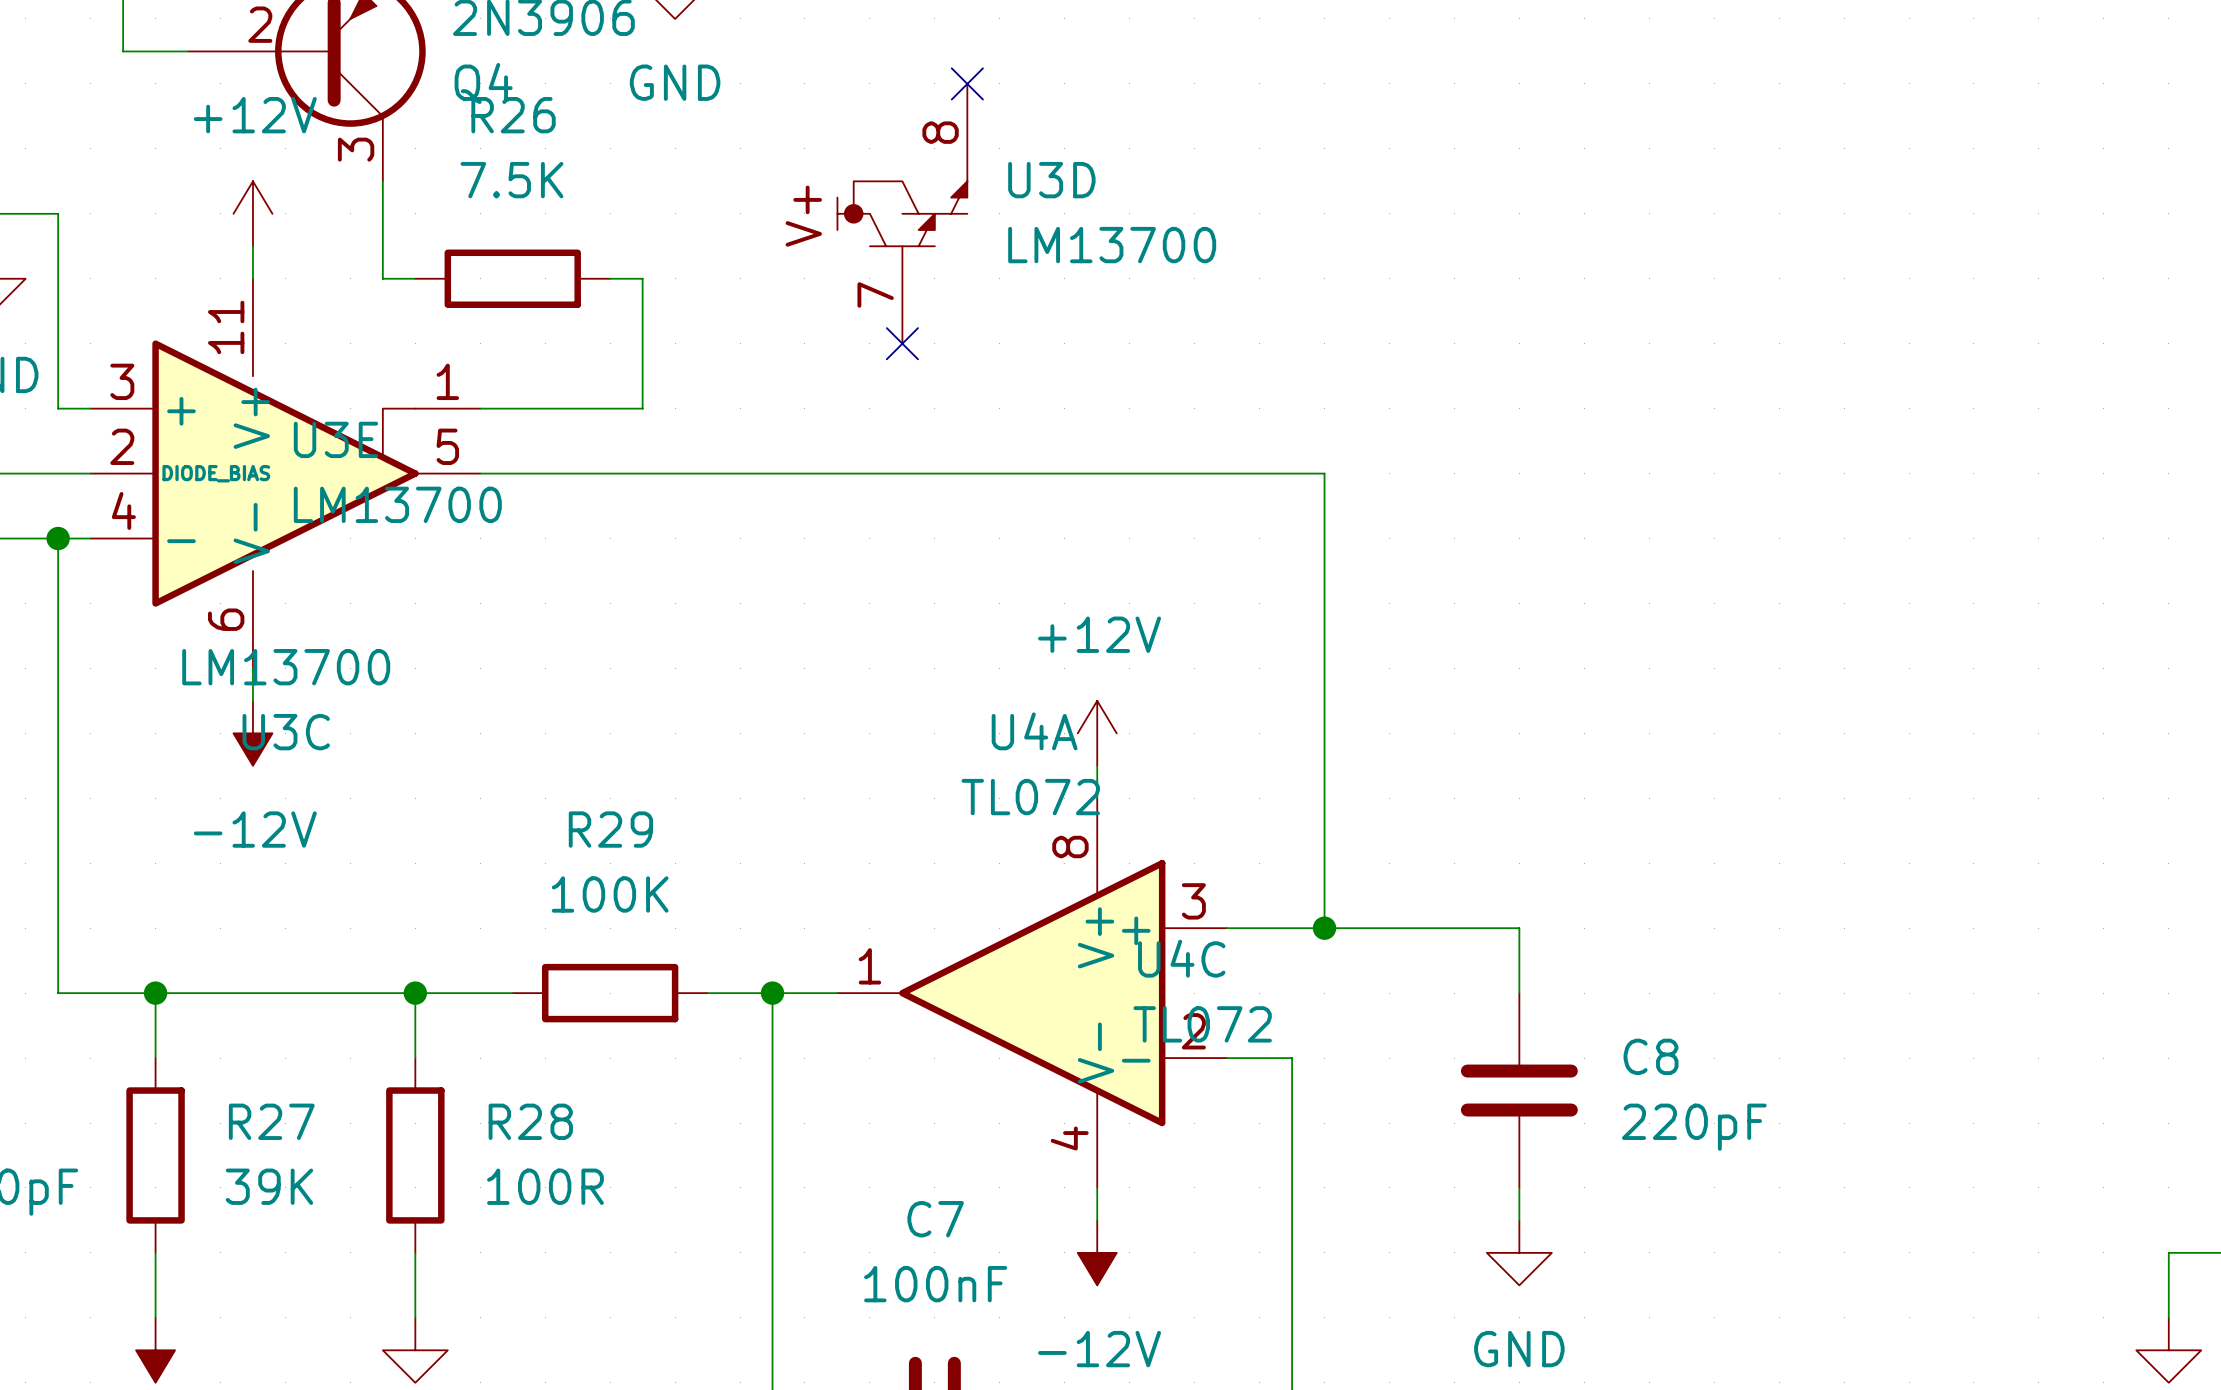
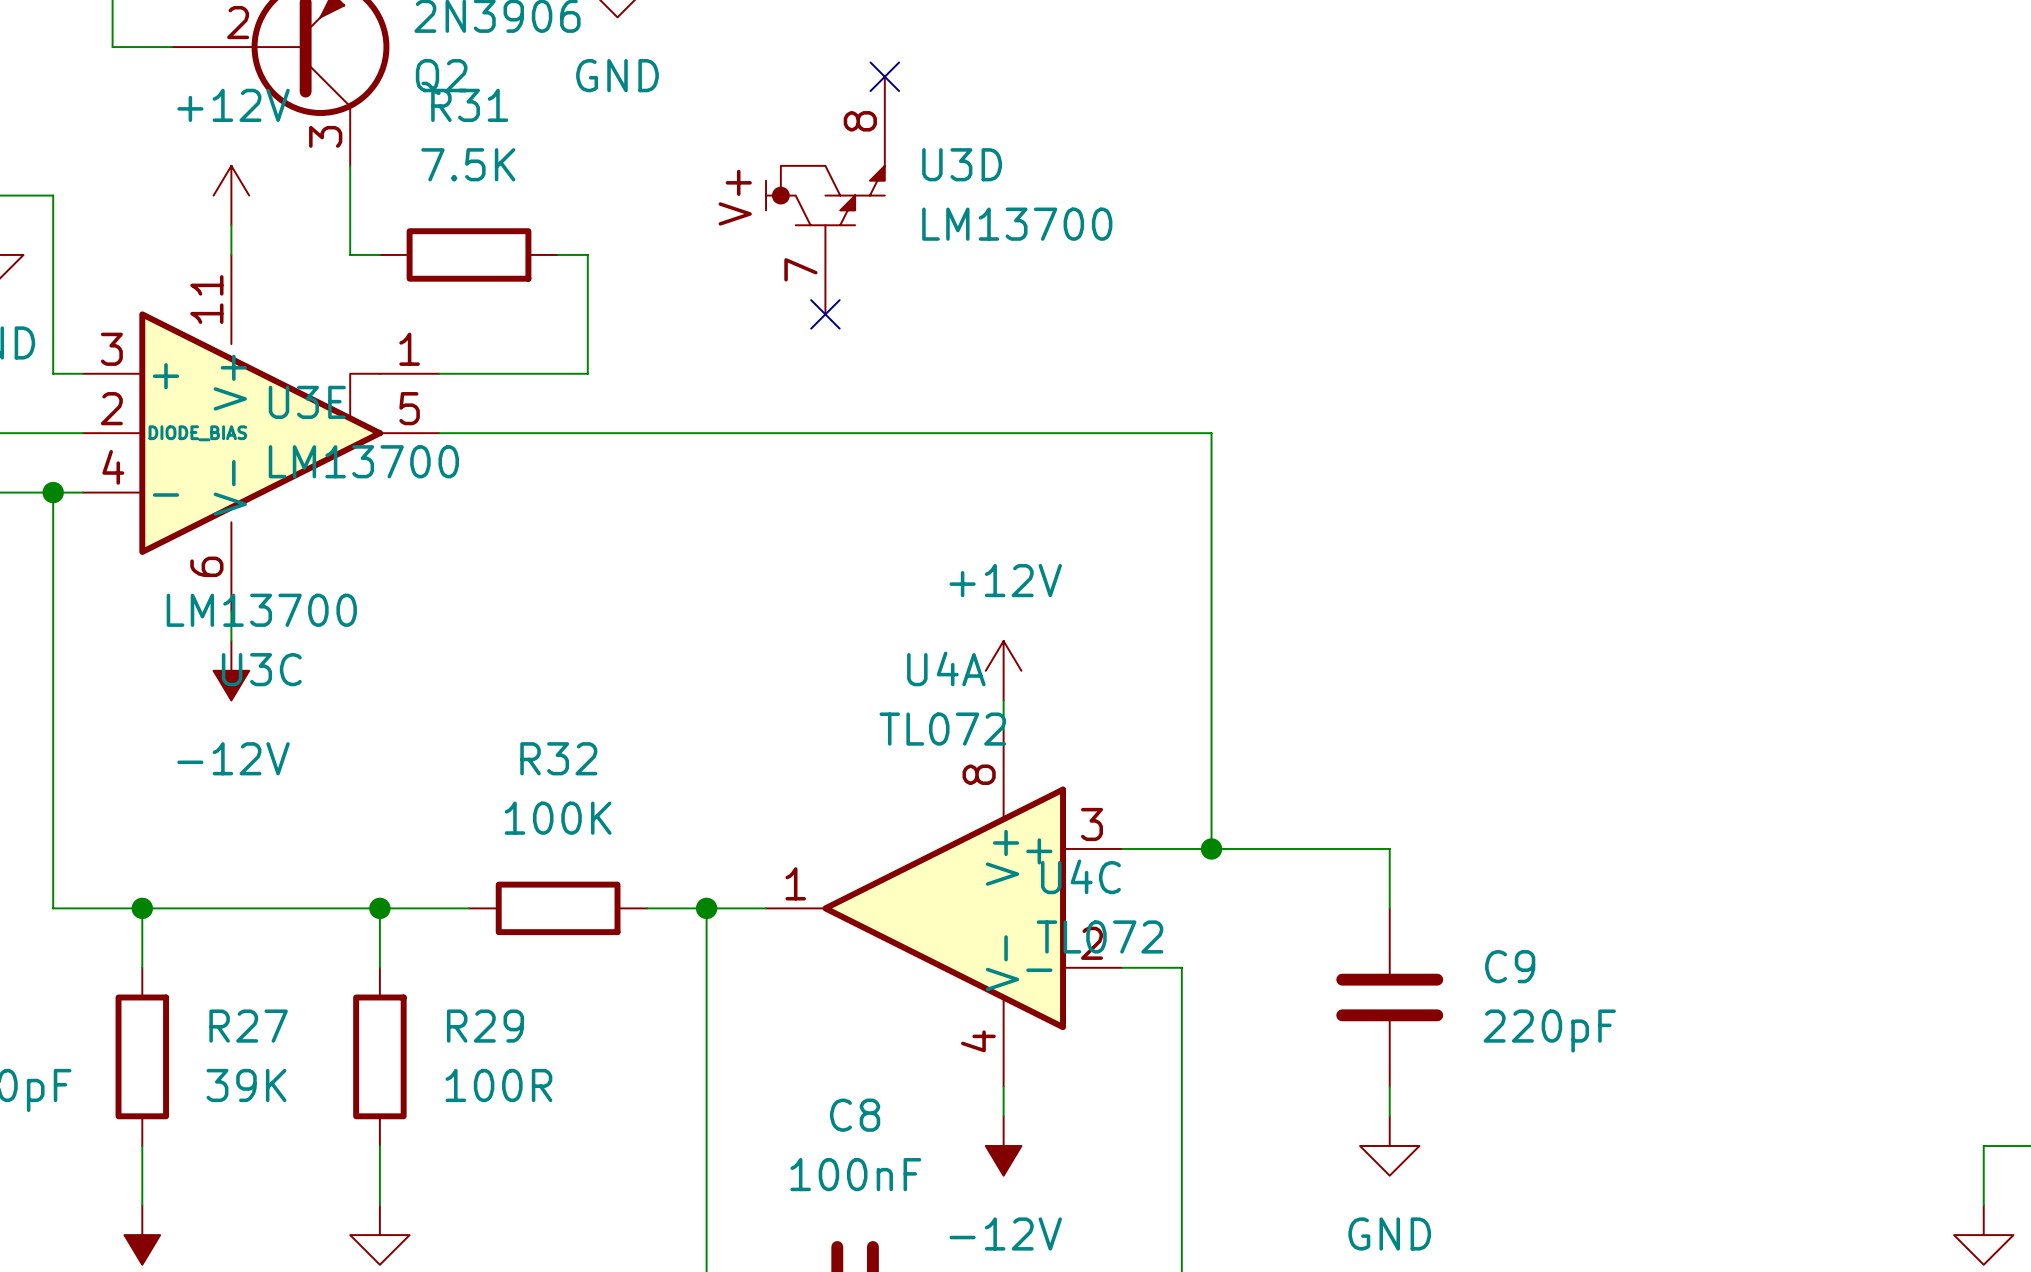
Q4 name: Q4 (483, 83) -> Q2 (441, 77)
R26 name: R26 (513, 115) -> R31 (469, 105)
R29 name: R29 (610, 829) -> R32 (558, 758)
C8 name: C8 (1651, 1056) -> C9 (1510, 966)
R28 name: R28 (530, 1121) -> R29 (485, 1026)
C7 name: C7 (935, 1219) -> C8 (855, 1115)

